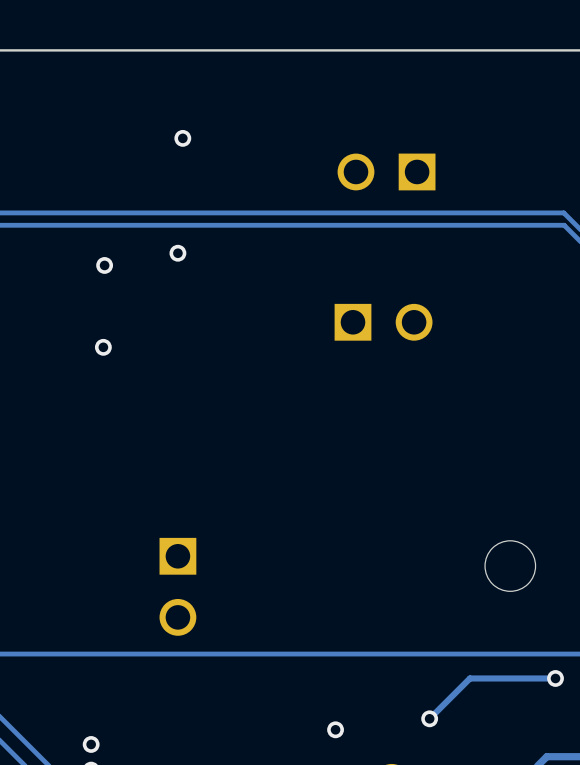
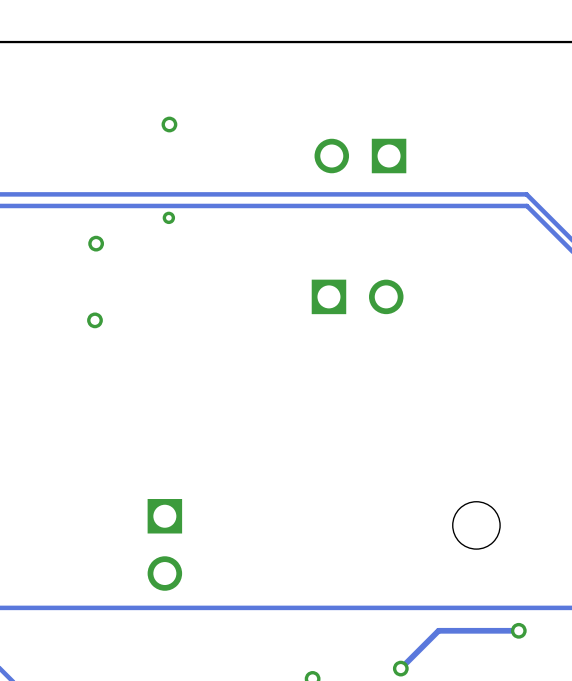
via: none -> (168, 217)
via: (177, 253) -> none

